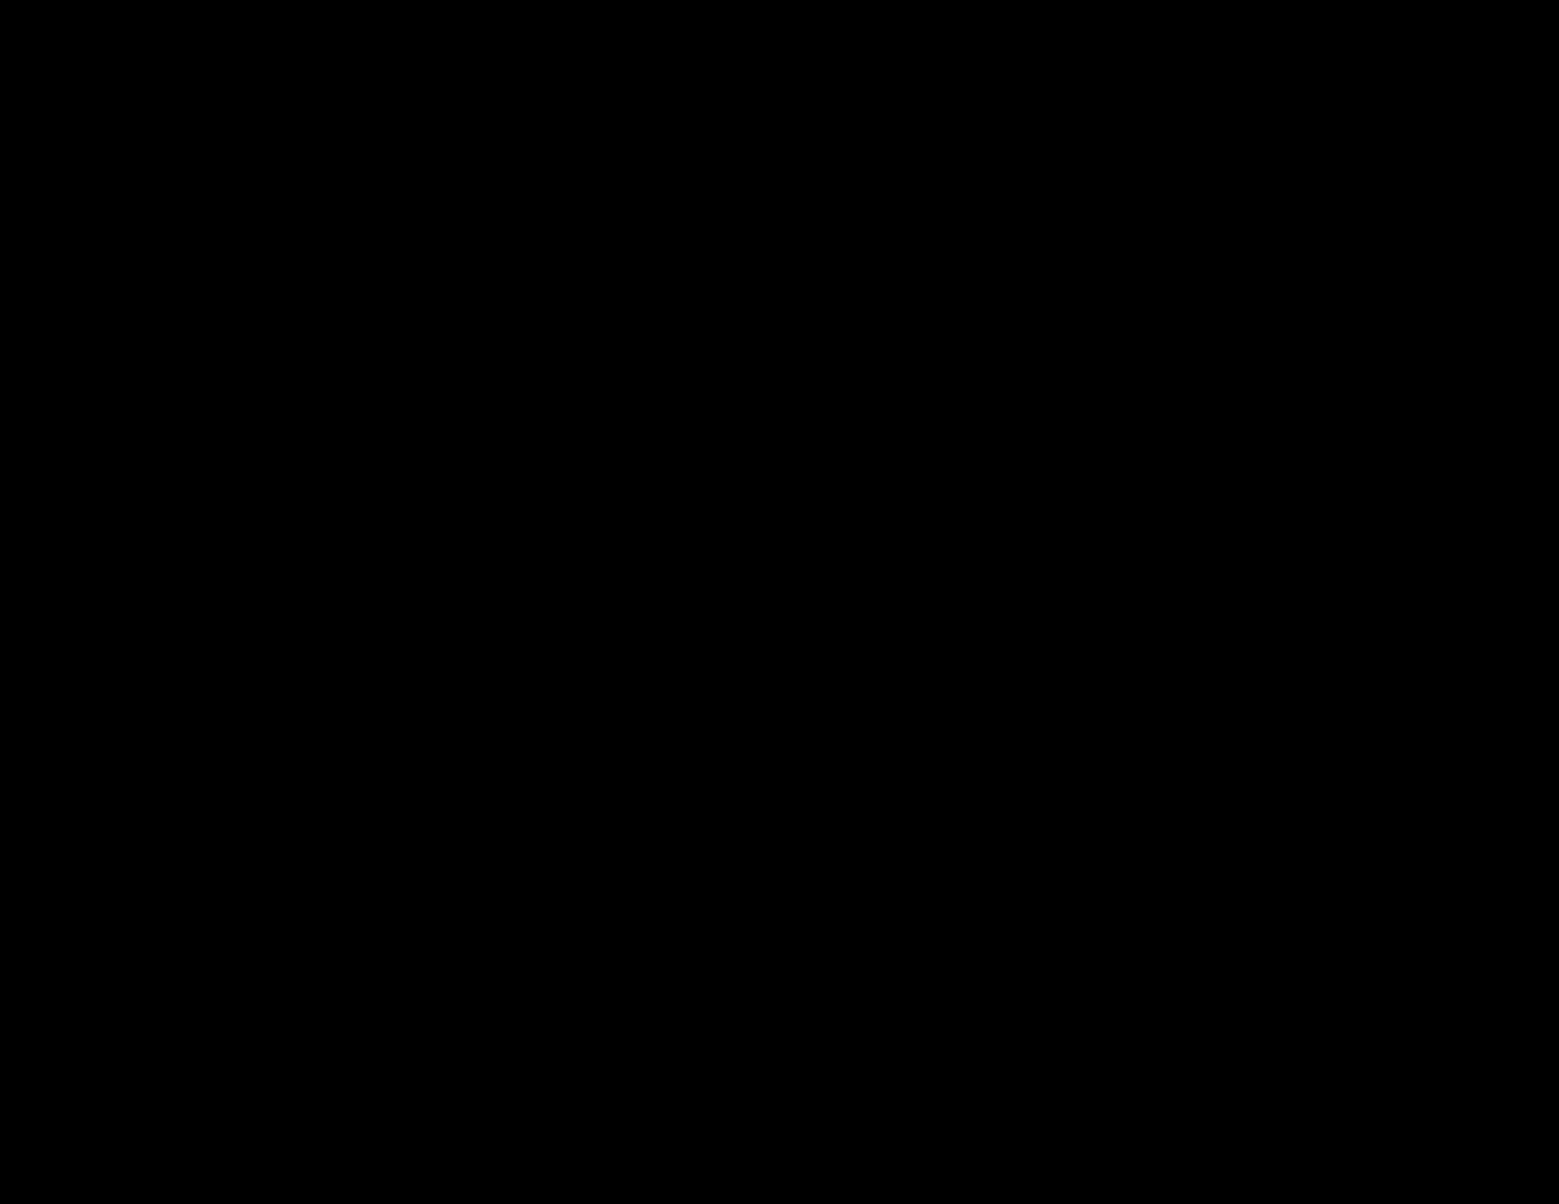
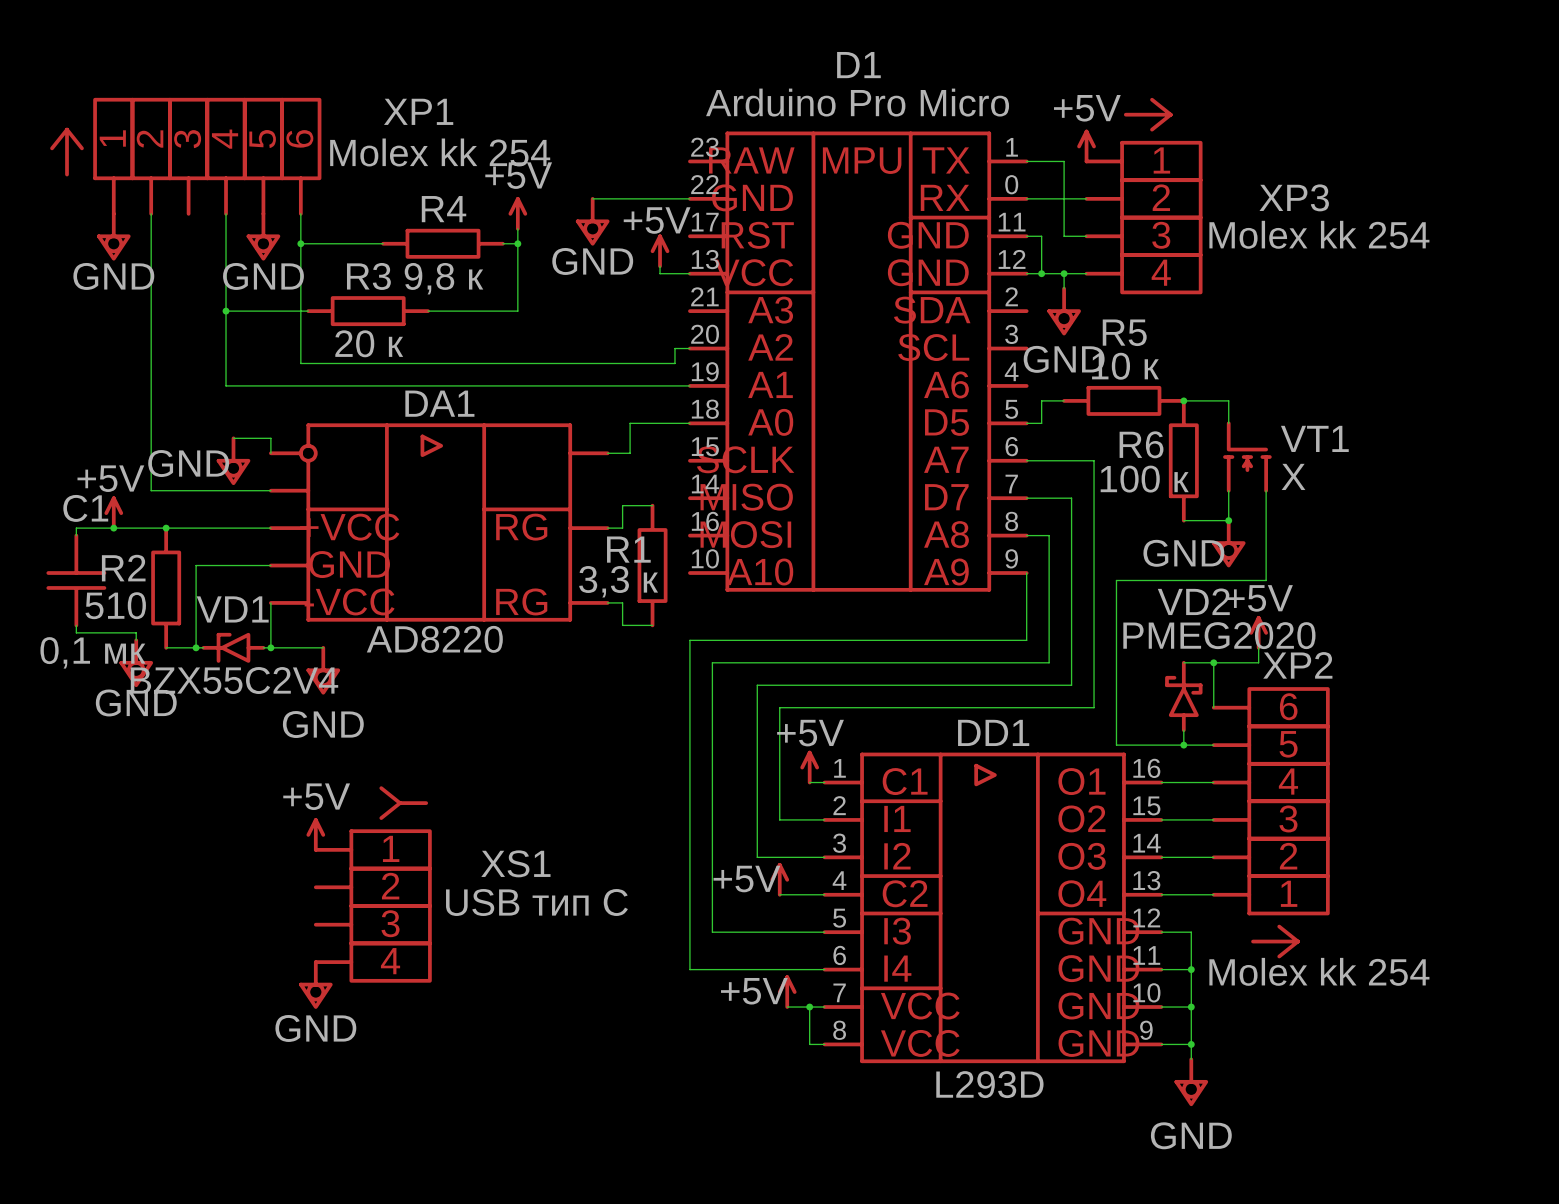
power symbol: none -> +5V (1086, 146)
XP1: none -> Molex kk 254 (185, 156)
wire: none -> (1026, 161) (1064, 161) (1064, 236) (1086, 236)
XP3: none -> Molex kk 254 (1143, 196)
wire: none -> (592, 198) (689, 198)
wire: none -> (1026, 198) (1086, 198)
wire: none -> (151, 213) (151, 490) (270, 490)
wire: none -> (226, 213) (226, 385) (689, 385)
wire: none -> (300, 213) (300, 363) (674, 363) (674, 348) (689, 348)
power symbol: none -> +5V (517, 213)
power symbol: none -> GND (592, 221)
wire: none -> (517, 228) (517, 311) (428, 311)
power symbol: none -> GND (113, 236)
power symbol: none -> GND (263, 236)
wire: none -> (1026, 236) (1041, 236) (1041, 273)
wire: none -> (300, 243) (383, 243)
junction: none -> (300, 243)
R4: none -> 9,8 к (443, 243)
wire: none -> (502, 243) (517, 243)
junction: none -> (517, 243)
power symbol: none -> +5V (660, 251)
wire: none -> (660, 266) (660, 273) (689, 273)
wire: none -> (1026, 273) (1086, 273)
junction: none -> (1041, 273)
wire: none -> (1064, 273) (1064, 288)
junction: none -> (1064, 273)
wire: none -> (226, 311) (308, 311)
junction: none -> (226, 311)
R3: none -> 20 к (368, 311)
power symbol: none -> GND (1064, 311)
D1: none -> Arduino Pro Micro (858, 361)
wire: none -> (1064, 400) (1041, 400) (1041, 423) (1026, 423)
R5: none -> 10 к (1123, 400)
wire: none -> (1183, 400) (1228, 400) (1228, 423)
junction: none -> (1183, 400)
wire: none -> (689, 423) (630, 423) (630, 453) (607, 453)
wire: none -> (233, 438) (270, 438) (270, 453)
VT1: none -> X (1247, 457)
power symbol: none -> GND (233, 460)
wire: none -> (1026, 460) (1094, 460) (1094, 707) (779, 707) (779, 819) (824, 819)
R6: none -> 100 к (1183, 460)
wire: none -> (1228, 490) (1228, 520) (1183, 520)
wire: none -> (1266, 490) (1266, 580) (1116, 580) (1116, 745) (1213, 745)
wire: none -> (1026, 498) (1071, 498) (1071, 685) (757, 685) (757, 857) (824, 857)
wire: none -> (652, 505) (622, 505) (622, 528) (607, 528)
power symbol: none -> +5V (113, 513)
junction: none -> (1228, 520)
DA1: none -> AD8220 (439, 522)
junction: none -> (113, 528)
junction: none -> (166, 528)
wire: none -> (270, 528) (76, 528) (76, 535)
wire: none -> (1026, 535) (1049, 535) (1049, 662) (712, 662) (712, 932) (824, 932)
power symbol: none -> GND (1228, 543)
wire: none -> (270, 565) (196, 565) (196, 647)
R1: none -> 3,3 к (652, 565)
wire: none -> (1026, 573) (1026, 640) (689, 640) (689, 969) (824, 969)
C1: none -> 0,1 мк (76, 580)
R2: none -> 510 (166, 587)
wire: none -> (270, 602) (270, 647)
wire: none -> (607, 602) (622, 602) (622, 625) (652, 625)
wire: none -> (76, 625) (76, 632) (136, 632) (136, 640)
power symbol: none -> +5V (1258, 632)
wire: none -> (166, 647) (203, 647)
junction: none -> (196, 647)
VD1: none -> BZX55C2V4 (233, 647)
wire: none -> (263, 647) (323, 647)
junction: none -> (270, 647)
wire: none -> (1258, 647) (1258, 662) (1183, 662)
power symbol: none -> GND (136, 662)
wire: none -> (1213, 662) (1213, 707)
junction: none -> (1213, 662)
power symbol: none -> GND (323, 670)
VD2: none -> PMEG2020 (1183, 696)
wire: none -> (1183, 730) (1183, 745)
junction: none -> (1183, 745)
power symbol: none -> +5V (809, 767)
wire: none -> (809, 782) (824, 782)
wire: none -> (1161, 782) (1213, 782)
wire: none -> (1161, 819) (1213, 819)
XP2: none -> Molex kk 254 (1270, 822)
power symbol: none -> +5V (315, 834)
wire: none -> (1161, 857) (1213, 857)
power symbol: none -> +5V (779, 879)
XS1: none -> USB тип C (372, 884)
wire: none -> (779, 894) (824, 894)
wire: none -> (1161, 894) (1213, 894)
DD1: none -> L293D (993, 907)
wire: none -> (1161, 932) (1191, 932) (1191, 1059)
wire: none -> (1161, 969) (1191, 969)
junction: none -> (1191, 969)
power symbol: none -> GND (315, 984)
power symbol: none -> +5V (787, 992)
wire: none -> (787, 1007) (824, 1007)
wire: none -> (809, 1007) (809, 1044) (824, 1044)
junction: none -> (809, 1007)
wire: none -> (1161, 1007) (1191, 1007)
junction: none -> (1191, 1007)
wire: none -> (1161, 1044) (1191, 1044)
junction: none -> (1191, 1044)
power symbol: none -> GND (1191, 1081)

